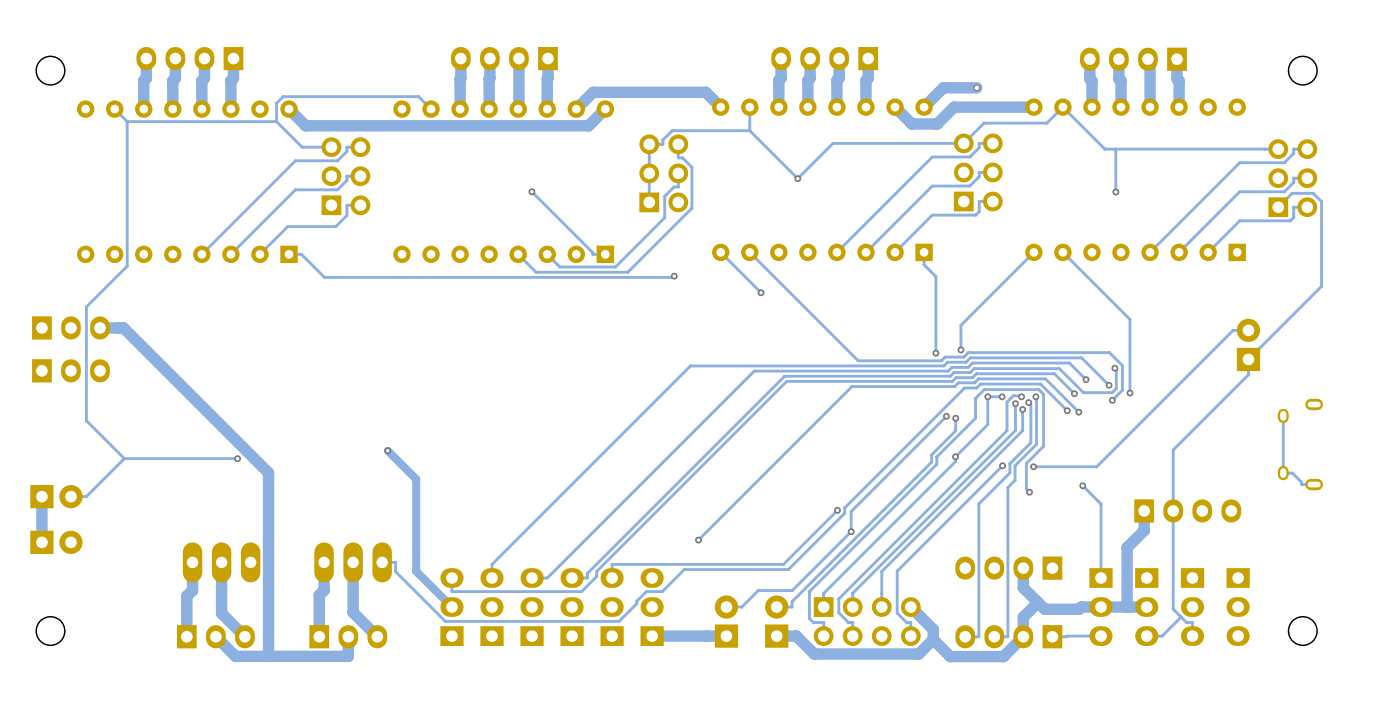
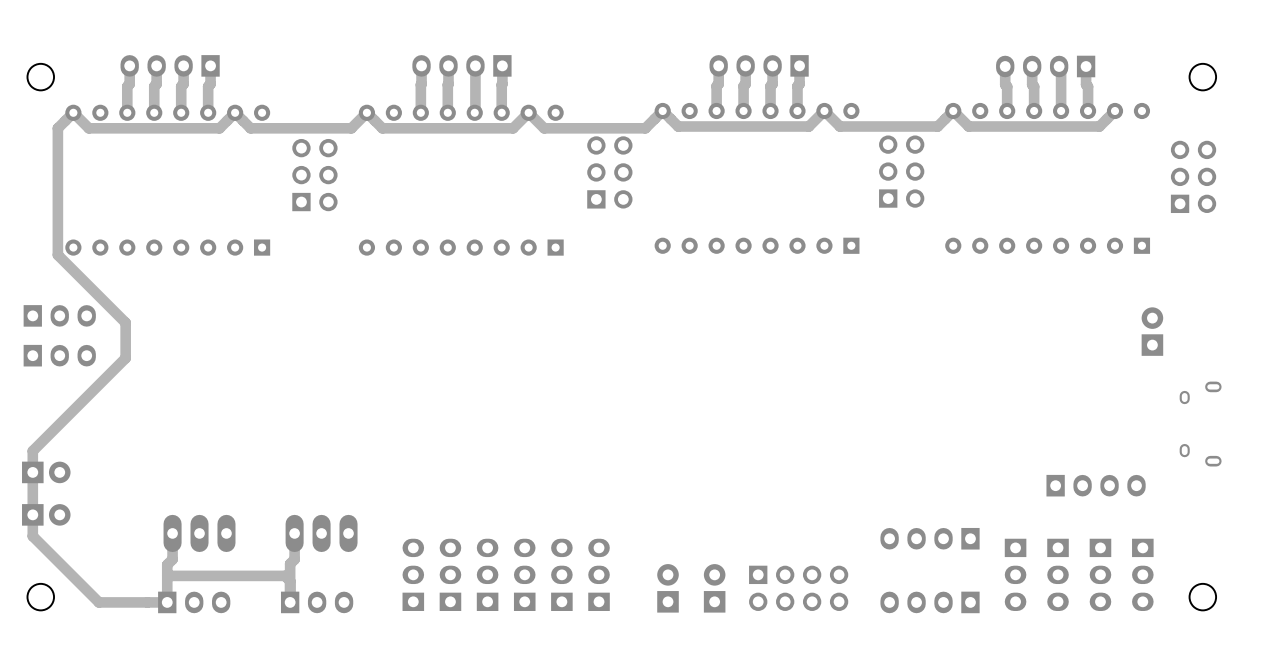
track: (976, 87) (943, 87) (924, 107) -> none
via: (976, 87) -> none
track: (720, 107) (705, 92) (593, 92) (576, 109) -> none
track: (749, 107) (749, 130) -> none
track: none -> (824, 110) (808, 126) (678, 126) (662, 110) (645, 128) (544, 128) (528, 112) (513, 128) (382, 128) (366, 112) (351, 128) (250, 128) (235, 112) (219, 128) (88, 128) (73, 112) (57, 128) (57, 255) (125, 322) (125, 358) (32, 451) (32, 472)
track: (1033, 107) (954, 107) (937, 123) (911, 123) -> (1115, 110) (1099, 126) (968, 126) (953, 110) (937, 126) (839, 126)
track: (114, 109) (127, 121) -> none
track: (431, 109) (418, 96) (283, 96) (276, 103) (276, 121) -> none
track: (605, 109) (588, 125) (305, 125) (289, 109) -> none
track: (127, 121) (127, 266) (86, 306) (86, 420) (124, 458) -> none
track: (276, 121) (302, 147) (331, 147) -> none
track: (276, 121) (127, 121) -> none
track: (749, 130) (672, 130) (662, 140) (662, 144) (649, 144) (649, 202) -> none
track: (749, 130) (797, 178) (832, 143) (963, 143) (984, 123) (1046, 123) (1062, 107) (1104, 149) (1278, 149) -> none
track: (992, 143) (979, 143) (979, 147) (969, 157) (932, 157) (836, 252) -> none
track: (678, 144) (678, 157) (682, 157) (691, 167) (691, 208) (627, 272) (536, 272) (518, 254) -> none
track: (360, 147) (346, 147) (346, 151) (337, 160) (295, 160) (201, 254) -> none
track: (1115, 149) (1115, 192) -> none
track: (1307, 149) (1293, 149) (1293, 153) (1284, 162) (1239, 162) (1150, 252) -> none
track: (992, 172) (979, 172) (979, 176) (969, 186) (932, 186) (865, 252) -> none
track: (678, 173) (678, 186) (674, 186) (664, 196) (664, 217) (615, 266) (559, 266) (547, 254) -> none
track: (360, 176) (346, 176) (346, 180) (337, 189) (295, 189) (230, 254) -> none
via: (797, 178) -> none
track: (1307, 178) (1293, 178) (1293, 182) (1284, 191) (1239, 191) (1179, 252) -> none
track: (531, 191) (592, 254) (605, 254) -> none
via: (531, 191) -> none
via: (1115, 192) -> none
track: (992, 201) (979, 201) (979, 211) (975, 215) (932, 215) (895, 252) -> none
track: (360, 205) (346, 205) (346, 215) (335, 226) (287, 226) (259, 254) -> none
track: (1278, 207) (1292, 193) (1313, 193) (1321, 201) (1321, 286) (1248, 359) (1248, 374) (1173, 450) (1173, 609) (1186, 622) (1192, 622) (1192, 636) -> none
track: (1307, 207) (1293, 207) (1293, 217) (1290, 220) (1239, 220) (1208, 252) -> none
track: (720, 252) (761, 292) -> none
track: (749, 252) (858, 360) (941, 360) (945, 357) (963, 357) (968, 352) (1109, 352) (1122, 365) (1122, 390) (1112, 400) -> none
track: (924, 252) (924, 264) (935, 276) (935, 353) -> none
track: (1033, 252) (960, 325) (960, 349) -> none
track: (1062, 252) (1129, 319) (1129, 393) -> none
track: (289, 254) (301, 254) (324, 277) (674, 276) -> none
via: (674, 276) -> none
via: (761, 292) -> none
track: (100, 327) (123, 327) (268, 472) (268, 656) -> none
track: (1248, 330) (1233, 330) (1096, 466) (1033, 466) -> none
via: (960, 349) -> none
via: (935, 353) -> none
track: (1114, 368) (1116, 388) (1112, 392) (1083, 392) (1059, 368) (974, 368) (970, 372) (954, 372) (950, 376) (784, 376) (587, 573) (587, 577) (572, 577) -> none
via: (1114, 368) -> none
track: (1086, 379) (1069, 363) (972, 363) (968, 367) (951, 367) (948, 371) (754, 371) (547, 577) (532, 577) -> none
via: (1086, 379) -> none
track: (1109, 385) (1081, 357) (970, 357) (966, 362) (947, 362) (943, 365) (690, 365) (492, 564) (492, 577) -> none
via: (1109, 385) -> none
track: (1074, 393) (1054, 373) (976, 373) (972, 377) (956, 377) (952, 381) (786, 381) (596, 571) (596, 576) (581, 591) (451, 591) (451, 577) -> none
via: (1074, 393) -> none
via: (1129, 393) -> none
via: (987, 396) -> none
track: (1002, 396) (987, 396) (987, 424) (955, 456) (955, 461) (823, 593) (823, 607) -> none
via: (1002, 396) -> none
track: (1021, 396) (1013, 395) (1007, 402) (1007, 430) (838, 598) (838, 612) (848, 622) (852, 622) (852, 636) -> none
via: (1021, 396) -> none
track: (1035, 396) (1036, 444) (1015, 465) (1015, 480) (1007, 487) (1007, 636) (994, 636) -> none
via: (1035, 396) -> none
via: (1112, 400) -> none
track: (1028, 402) (1030, 404) (1030, 442) (1009, 463) (1009, 472) (978, 503) (978, 636) (965, 636) -> none
via: (1028, 402) -> none
track: (1015, 403) (1015, 430) (852, 593) (852, 607) -> none
via: (1015, 403) -> none
track: (1022, 409) (1022, 430) (881, 571) (881, 607) -> none
via: (1022, 409) -> none
track: (1067, 410) (1040, 384) (980, 384) (976, 387) (964, 387) (844, 507) (844, 513) (788, 569) (684, 569) (662, 591) (646, 591) (619, 621) (445, 621) (395, 571) (395, 562) (382, 562) -> none
via: (1067, 410) -> none
track: (1078, 412) (1045, 378) (978, 378) (974, 382) (958, 382) (954, 386) (851, 386) (698, 540) -> none
via: (1078, 412) -> none
track: (1283, 415) (1283, 473) (1292, 473) (1301, 484) (1314, 484) -> none
track: (946, 416) (851, 511) (851, 531) (792, 590) (758, 590) (741, 607) (726, 607) -> none
via: (946, 416) -> none
track: (955, 418) (955, 430) (931, 454) (931, 462) (792, 601) (792, 607) (776, 607) -> none
via: (955, 418) -> none
track: (387, 450) (416, 479) (416, 571) (451, 607) -> none
via: (387, 450) -> none
via: (955, 456) -> none
track: (124, 458) (86, 496) (70, 496) -> none
track: (237, 458) (124, 458) -> none
via: (237, 458) -> none
track: (1002, 465) (897, 571) (897, 613) (906, 622) (910, 622) (910, 636) -> none
via: (1002, 465) -> none
via: (1033, 466) -> none
track: (1082, 485) (1101, 504) (1101, 577) -> none
via: (1082, 485) -> none
track: (1029, 492) (1026, 489) (1026, 463) (1043, 446) (1043, 394) (1038, 389) (984, 389) (975, 398) (975, 418) (936, 456) (936, 464) (809, 591) (809, 618) (813, 622) (823, 622) (823, 636) -> none
via: (1029, 492) -> none
track: (837, 510) (783, 564) (612, 564) (612, 577) -> none
via: (837, 510) -> none
track: (1144, 510) (1144, 530) (1127, 547) (1127, 607) -> none
via: (851, 531) -> none
via: (698, 540) -> none
track: none -> (32, 514) (32, 536) (98, 602) (167, 602)
track: (221, 562) (221, 613) (244, 636) -> none
track: (353, 562) (353, 612) (377, 636) -> none
track: (1023, 568) (1023, 587) (1044, 609) (1146, 607) -> none
track: (1038, 602) (1023, 617) (1023, 636) (1003, 656) (950, 656) (933, 639) -> none
track: (910, 607) (933, 629) (933, 639) -> none
track: none -> (167, 575) (285, 575) (290, 581)
track: (1181, 617) (1162, 636) (1146, 636) -> none
track: (348, 636) (348, 656) (235, 656) (215, 636) -> none
track: (726, 636) (652, 636) -> none
track: (776, 636) (796, 636) (814, 654) (918, 654) (933, 639) -> none
track: (1101, 636) (1052, 636) -> none

